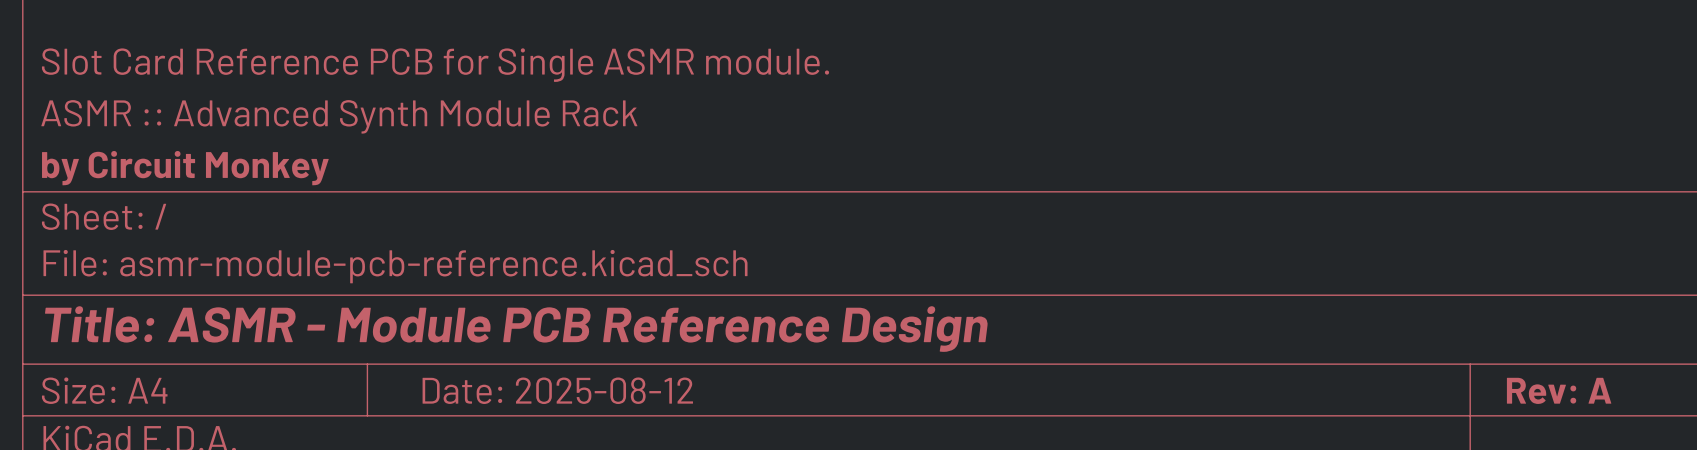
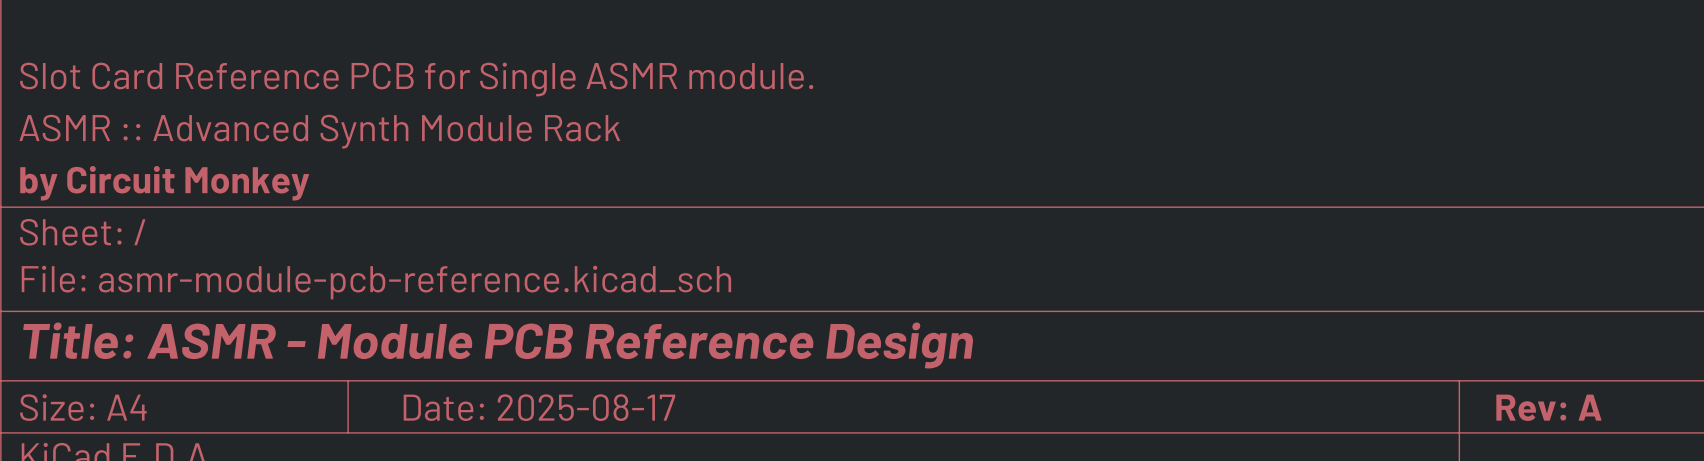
title block: Date: 2025-08-12 (557, 390) -> Date: 2025-08-17 (539, 407)

